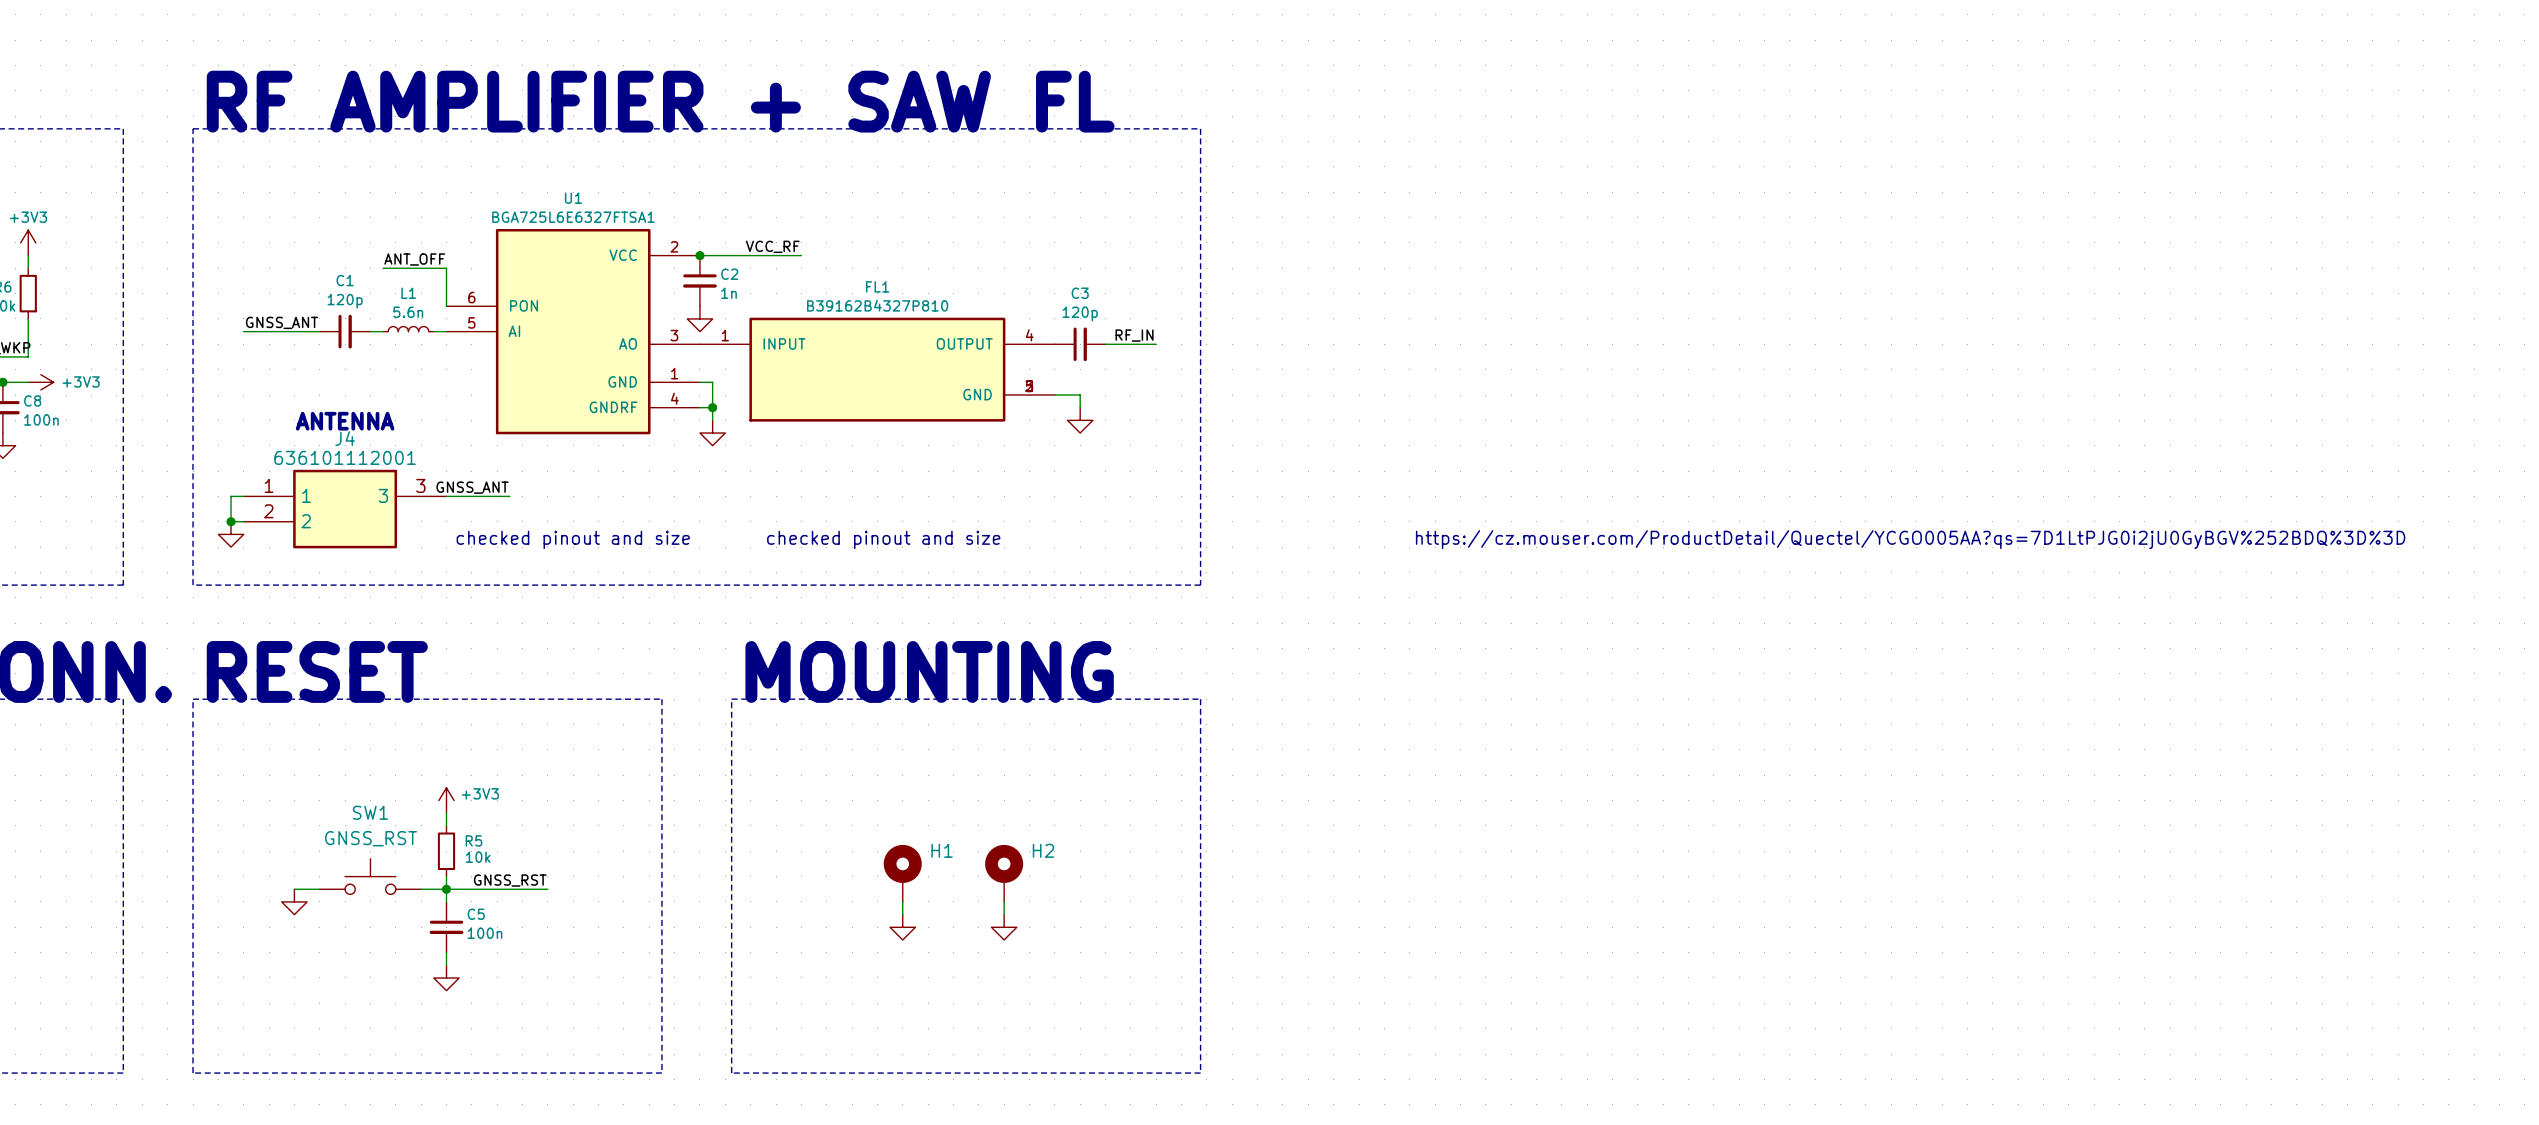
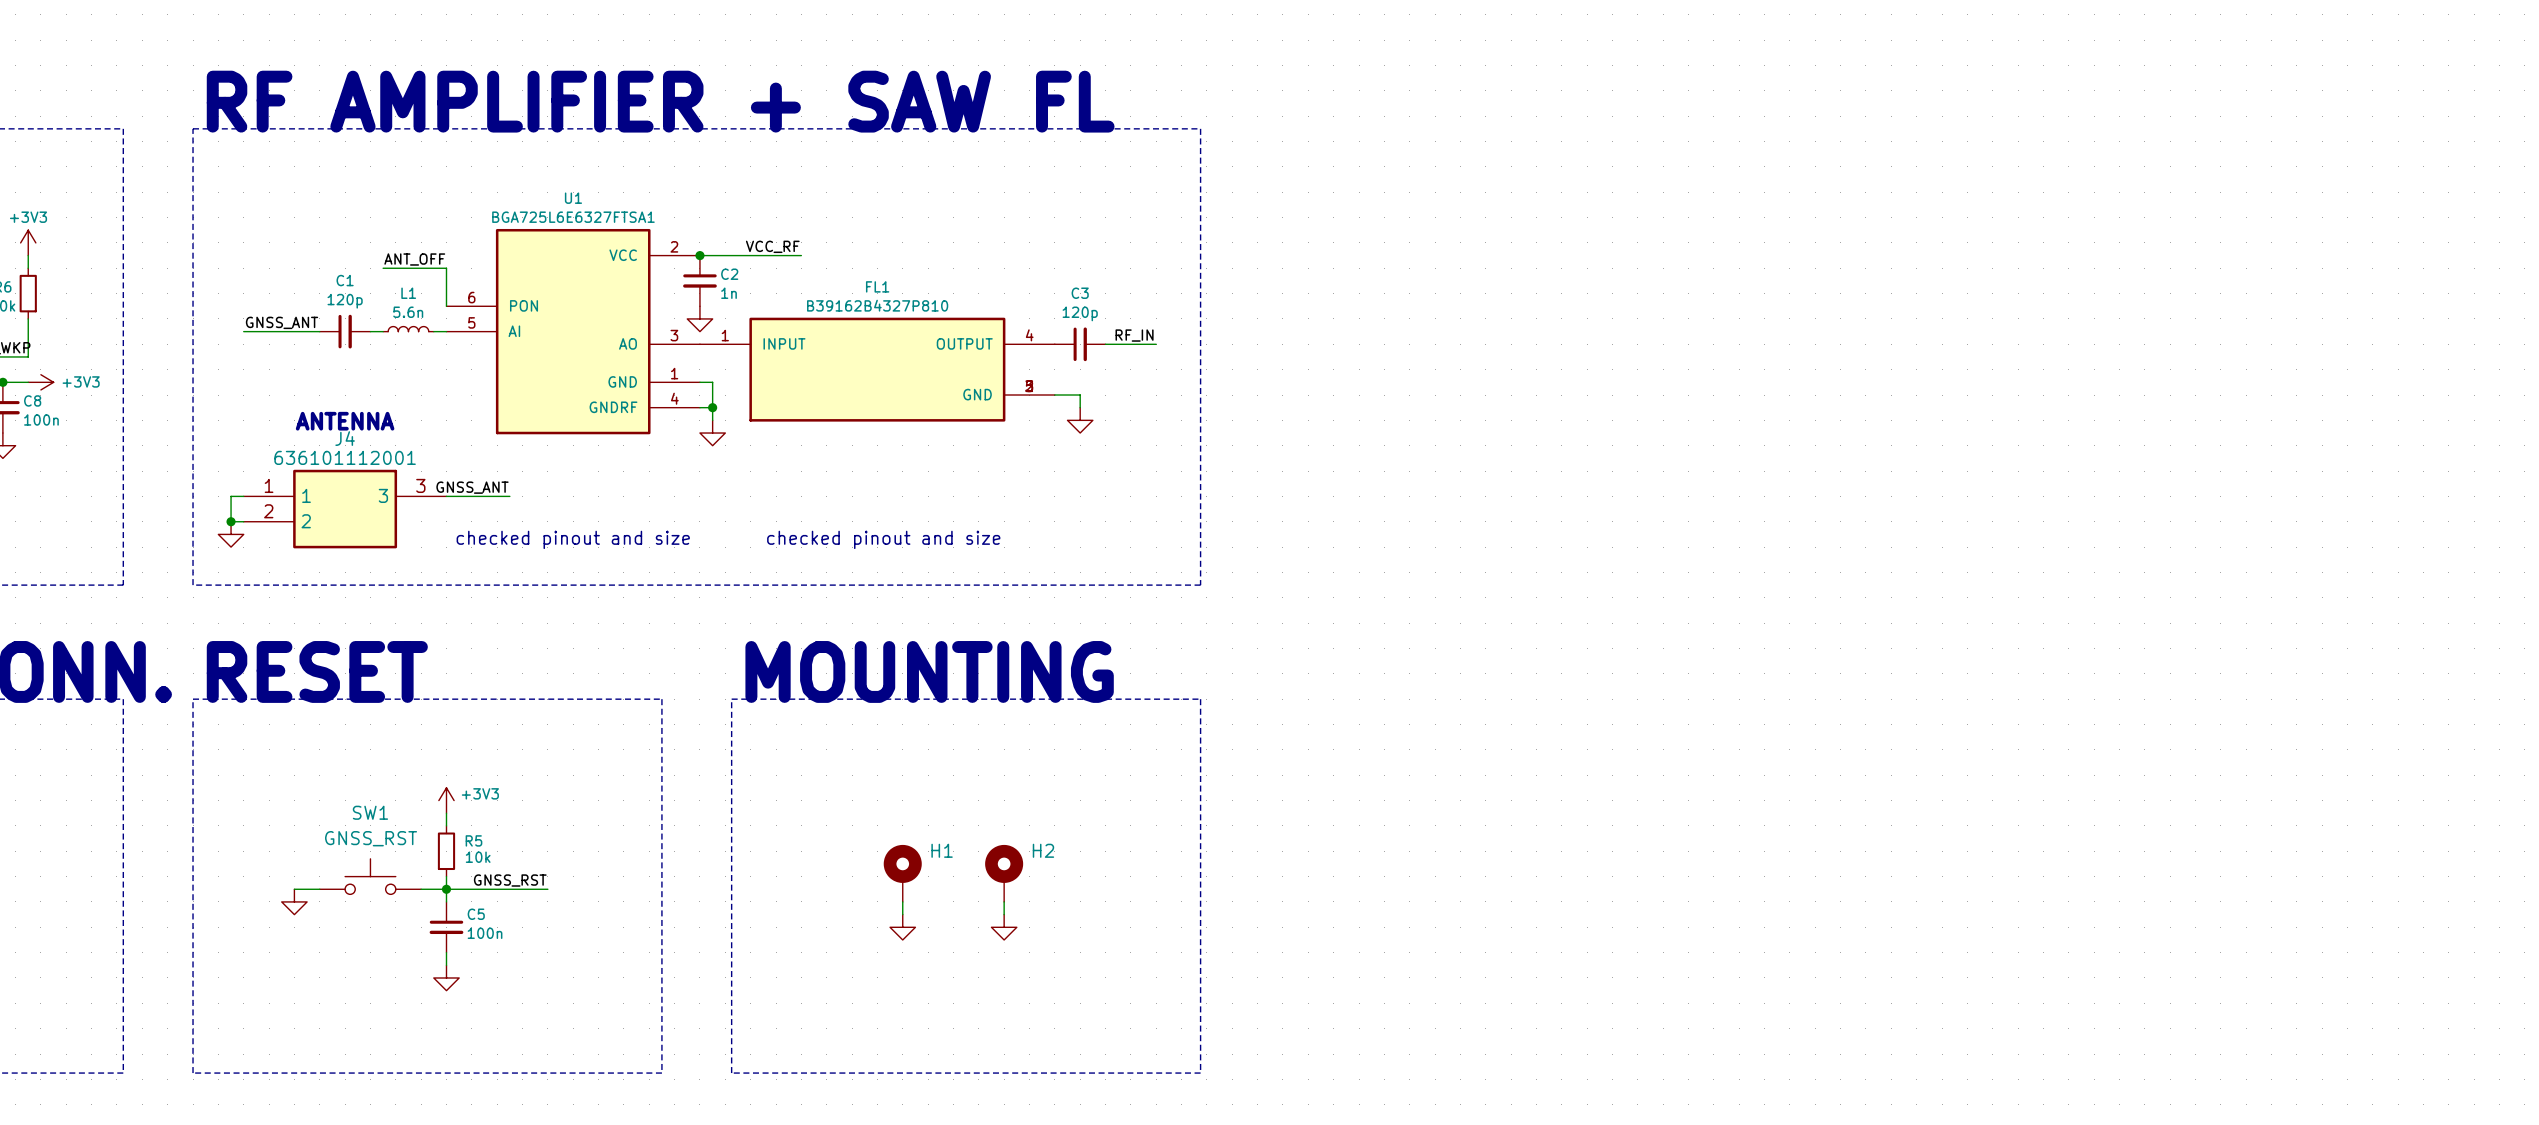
text: https://cz.mouser.com/ProductDetail/Quectel/YCGO005AA?qs=7D1LtPJG0i2jU0GyBGV%252BDQ%3D%3D (1910, 539) -> none

